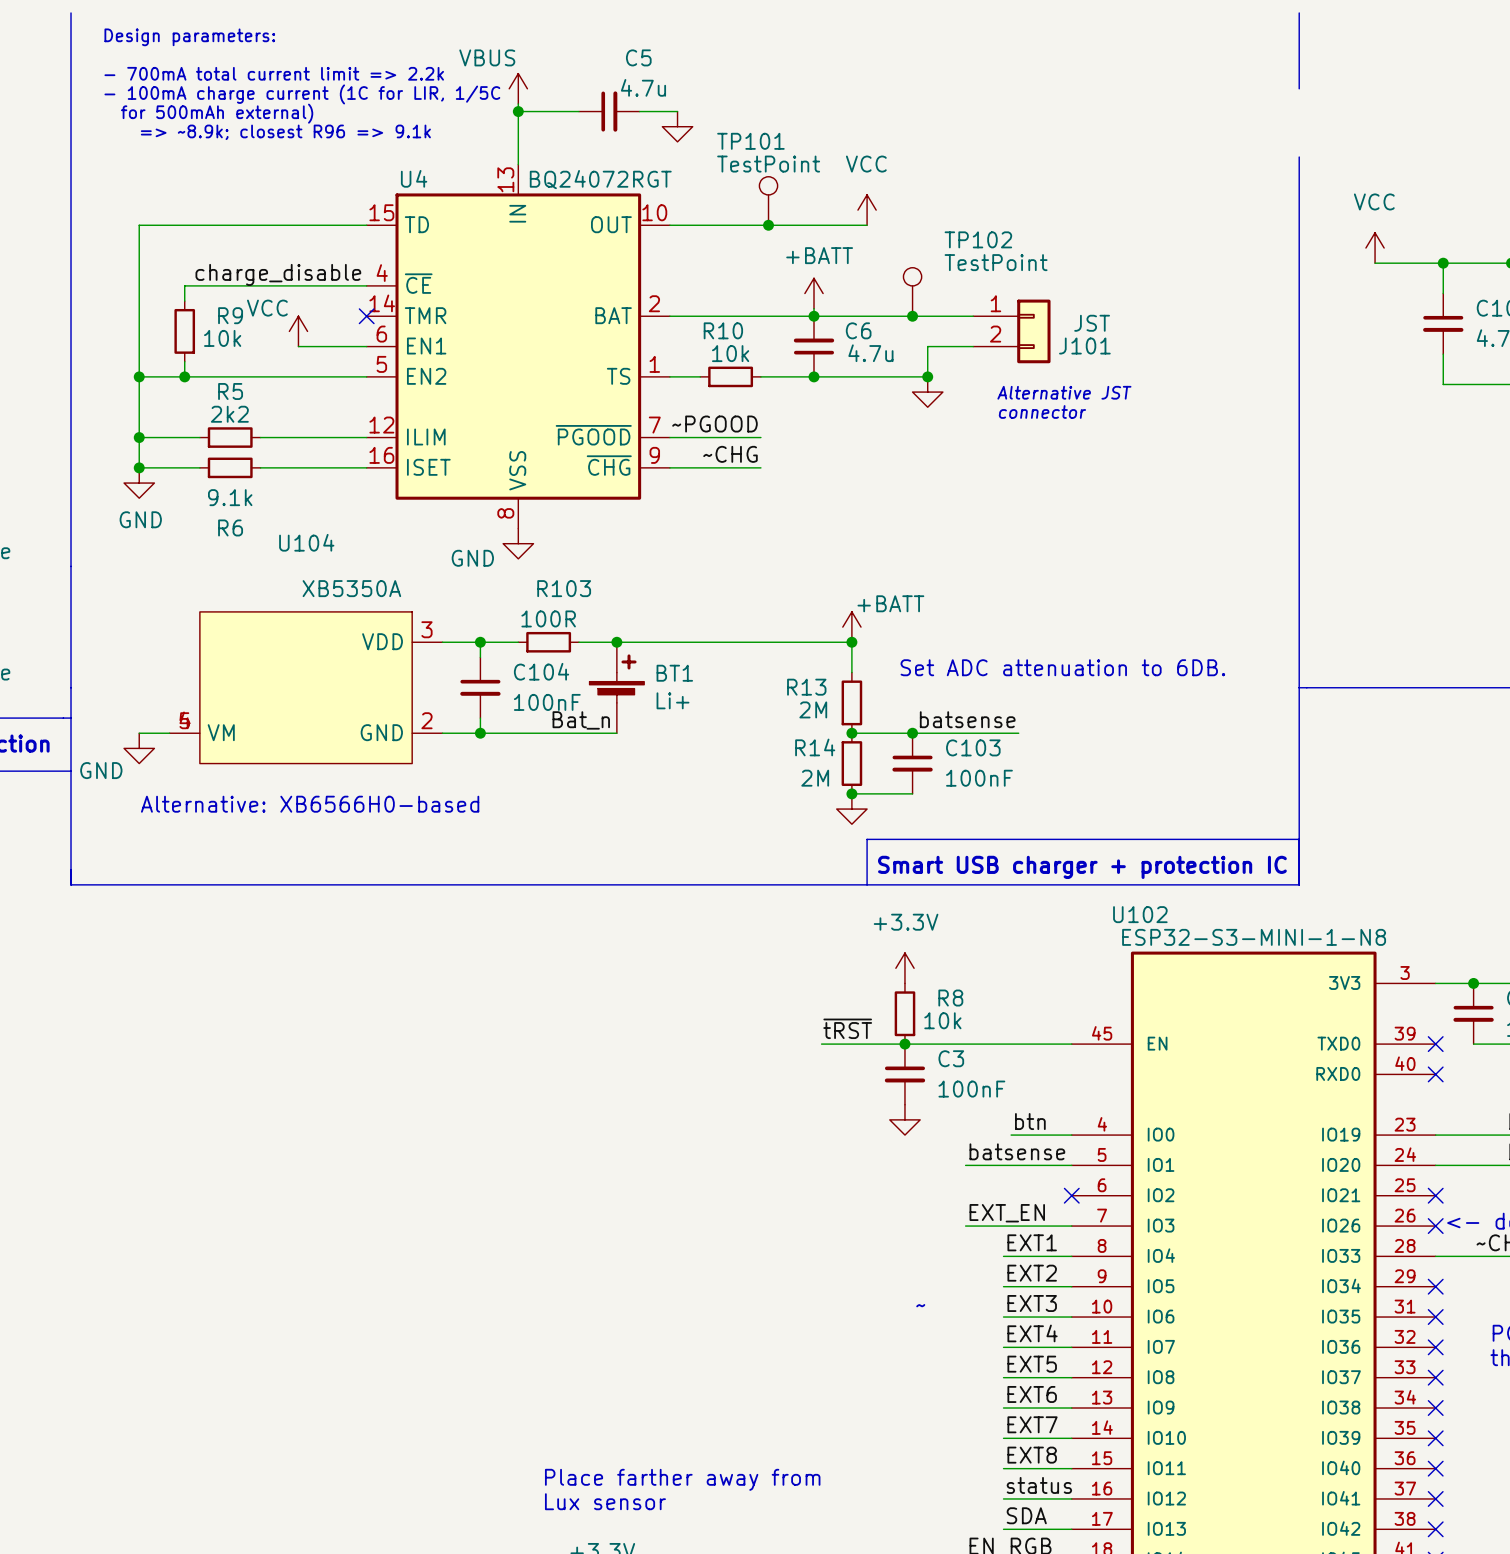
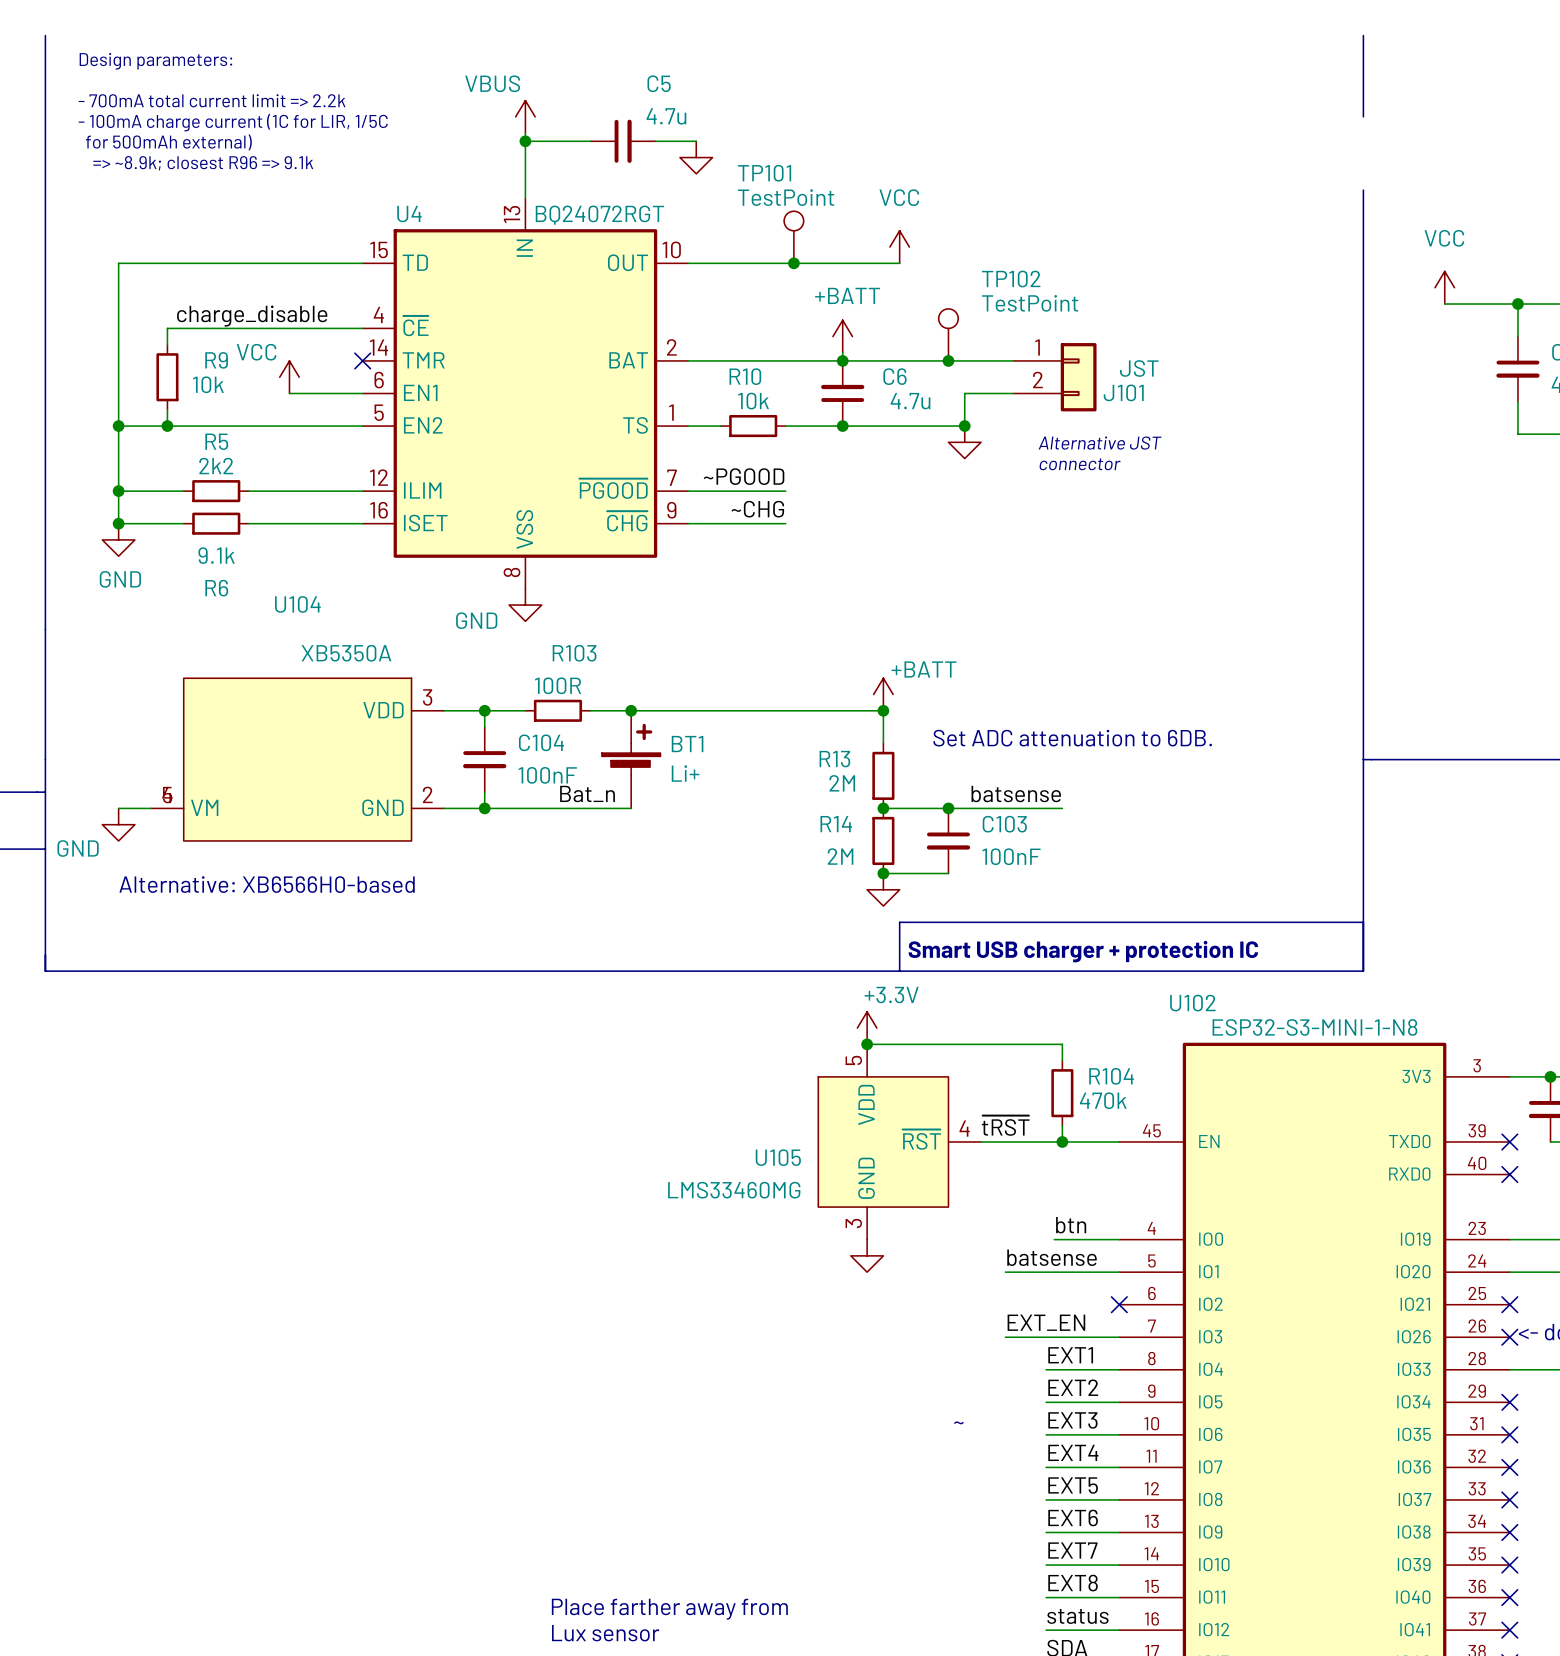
power symbol text position: +3.3V (906, 922) -> +3.3V (891, 995)
wire: none -> (867, 1044) (1062, 1044) (1062, 1060)
junction: none -> (867, 1044)
power symbol position: +3.3V (904, 968) -> +3.3V (867, 1028)
R104: none -> 470k (1062, 1093)
R8: 10k (904, 1013) -> none
label position: ~{tRST} (847, 1028) -> ~{tRST} (1005, 1125)
wire: none -> (1062, 1125) (1062, 1141)
U105: none -> LMS33460MG (899, 1141)
junction: (904, 1044) -> none
junction: none -> (1062, 1141)
C3: 100nF (904, 1074) -> none
power symbol position: (904, 1119) -> (867, 1255)

